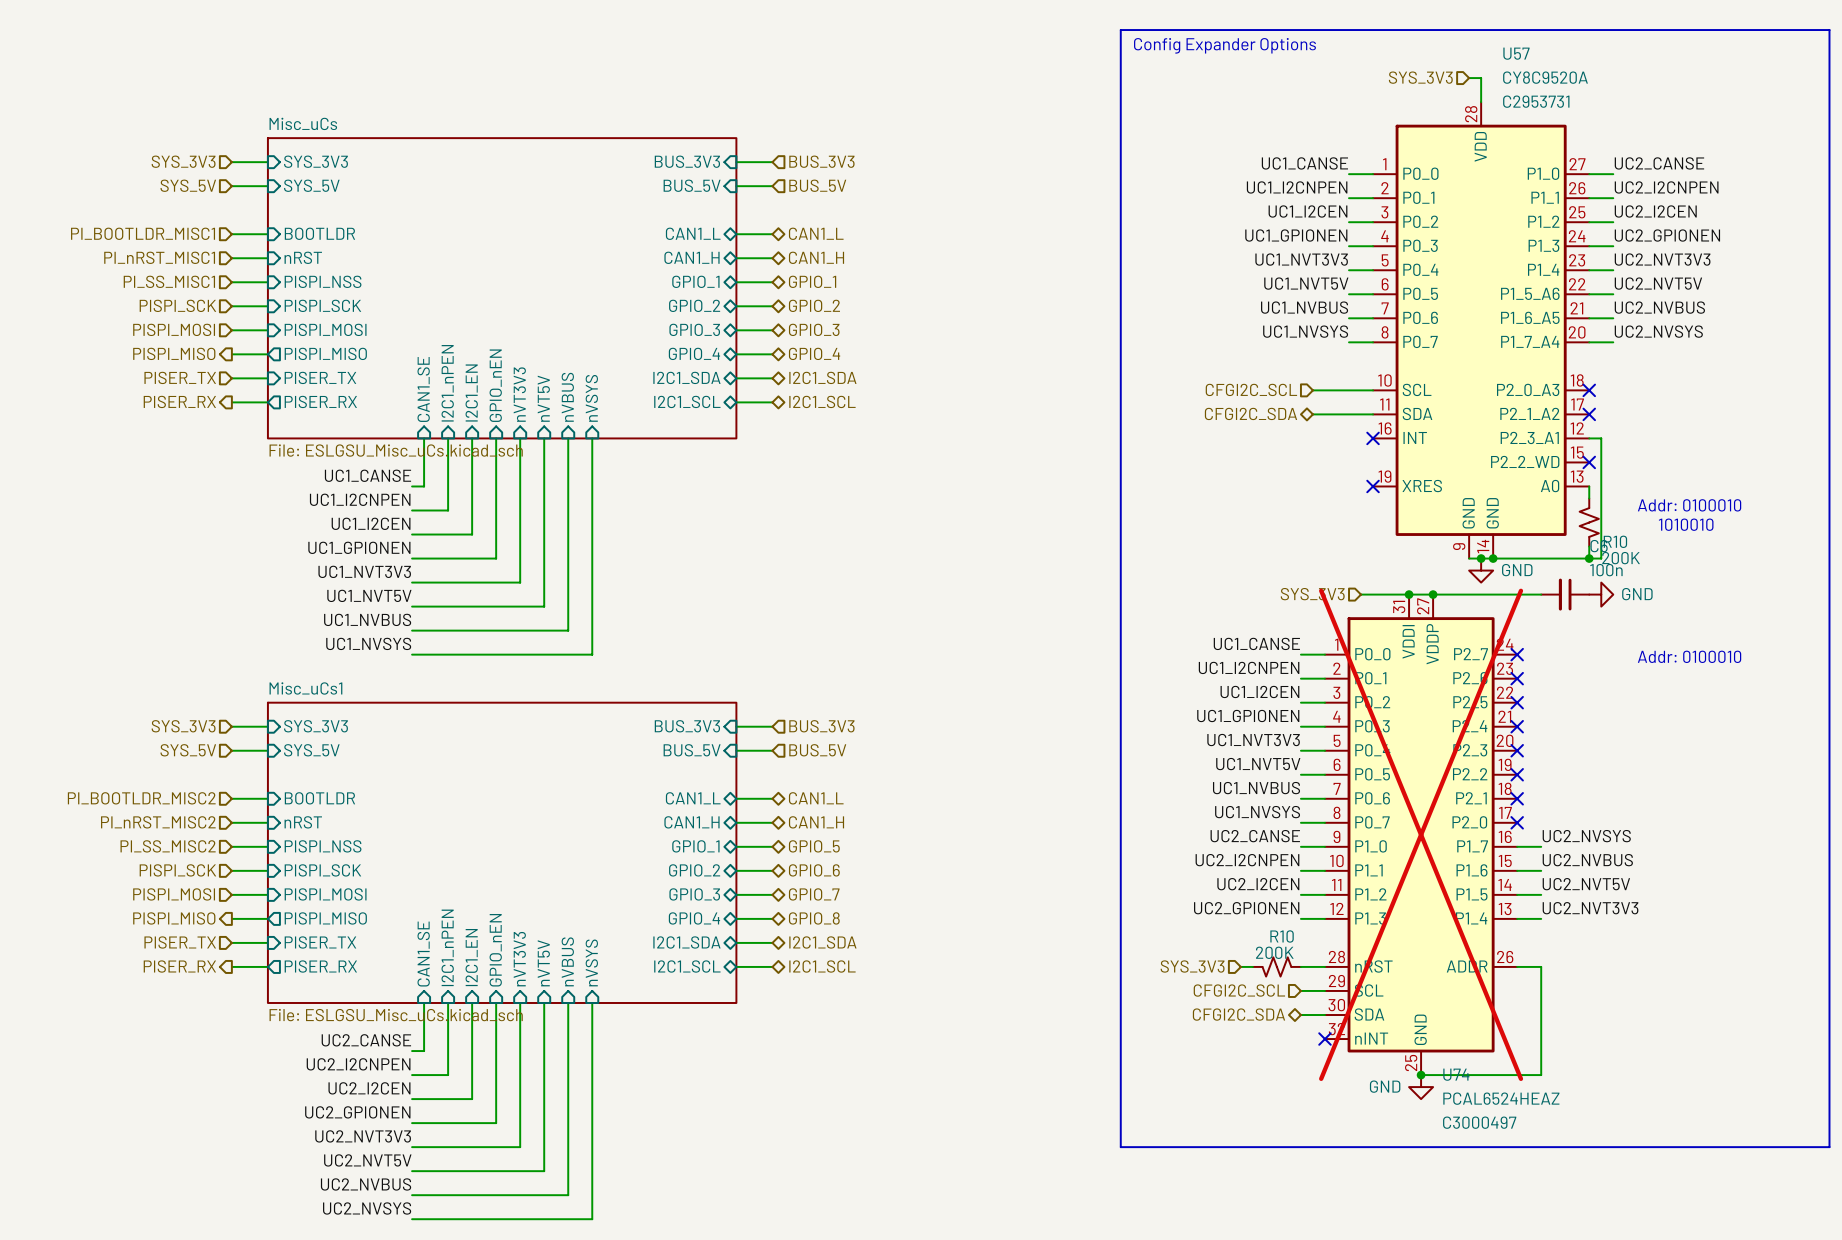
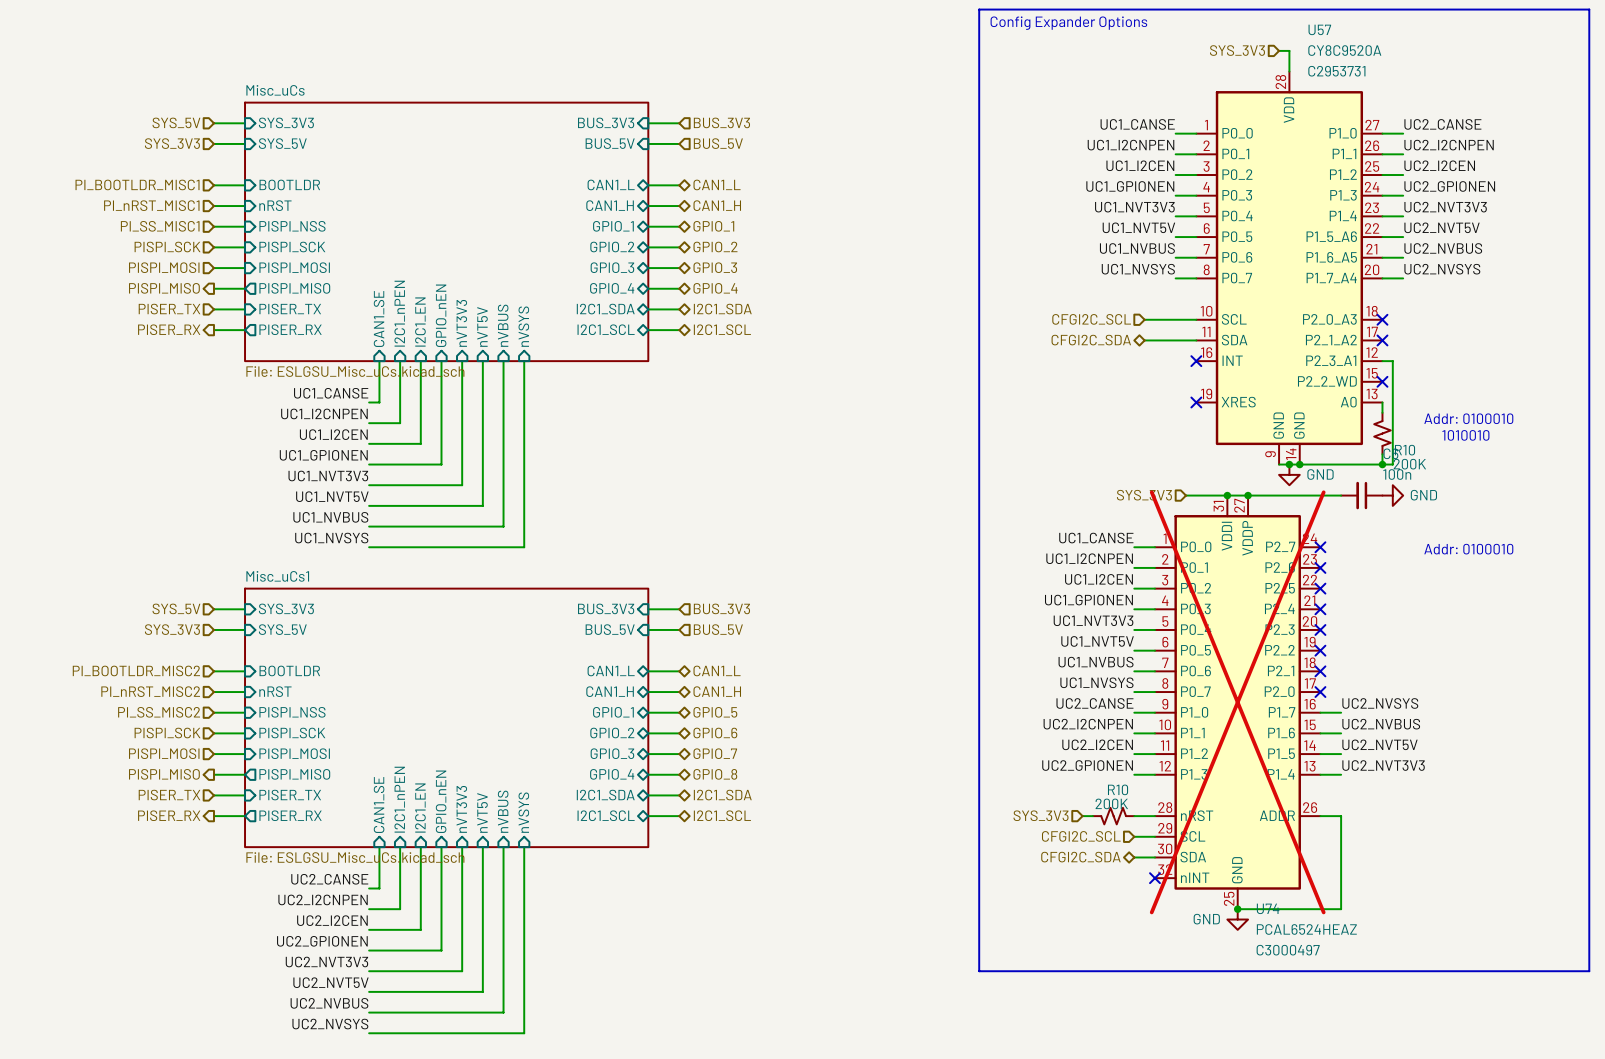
hierarchical label: SYS_3V3 (183, 161) -> SYS_5V (176, 122)
hierarchical label: SYS_5V (188, 185) -> SYS_3V3 (172, 143)
hierarchical label: SYS_3V3 (183, 726) -> SYS_5V (176, 608)
hierarchical label: SYS_5V (188, 750) -> SYS_3V3 (172, 629)

